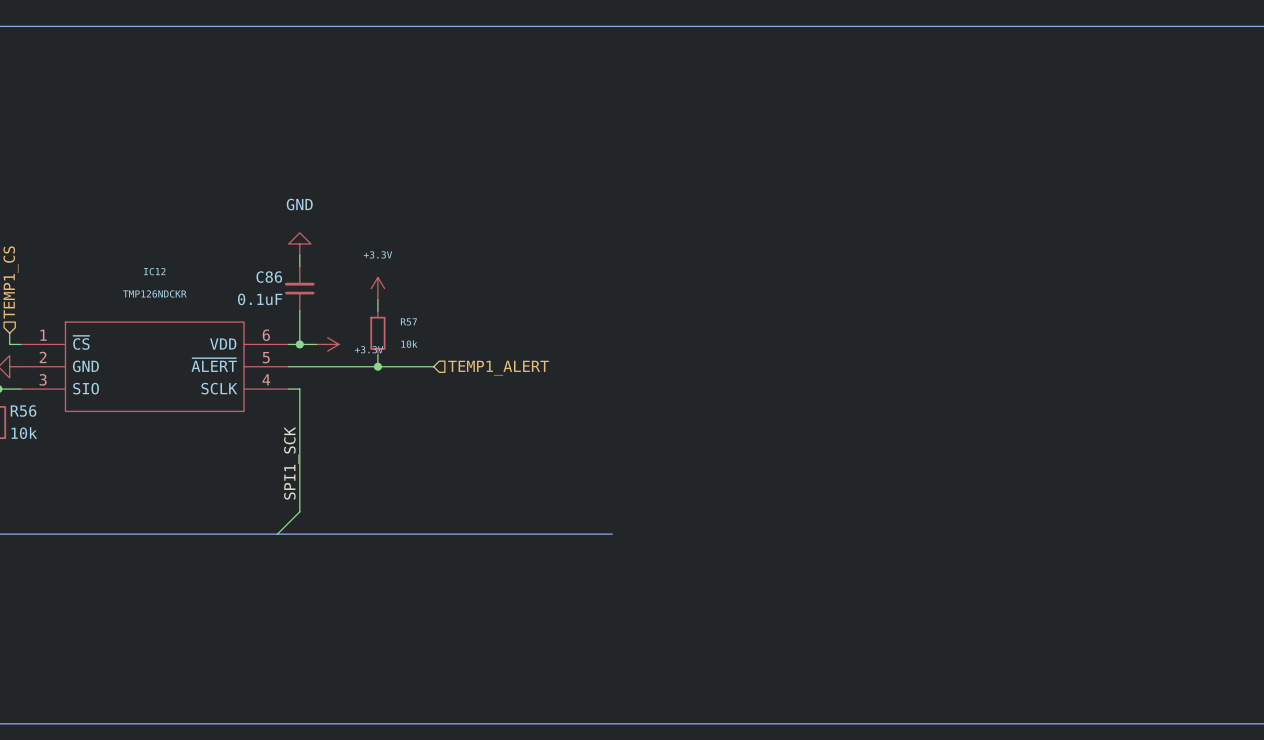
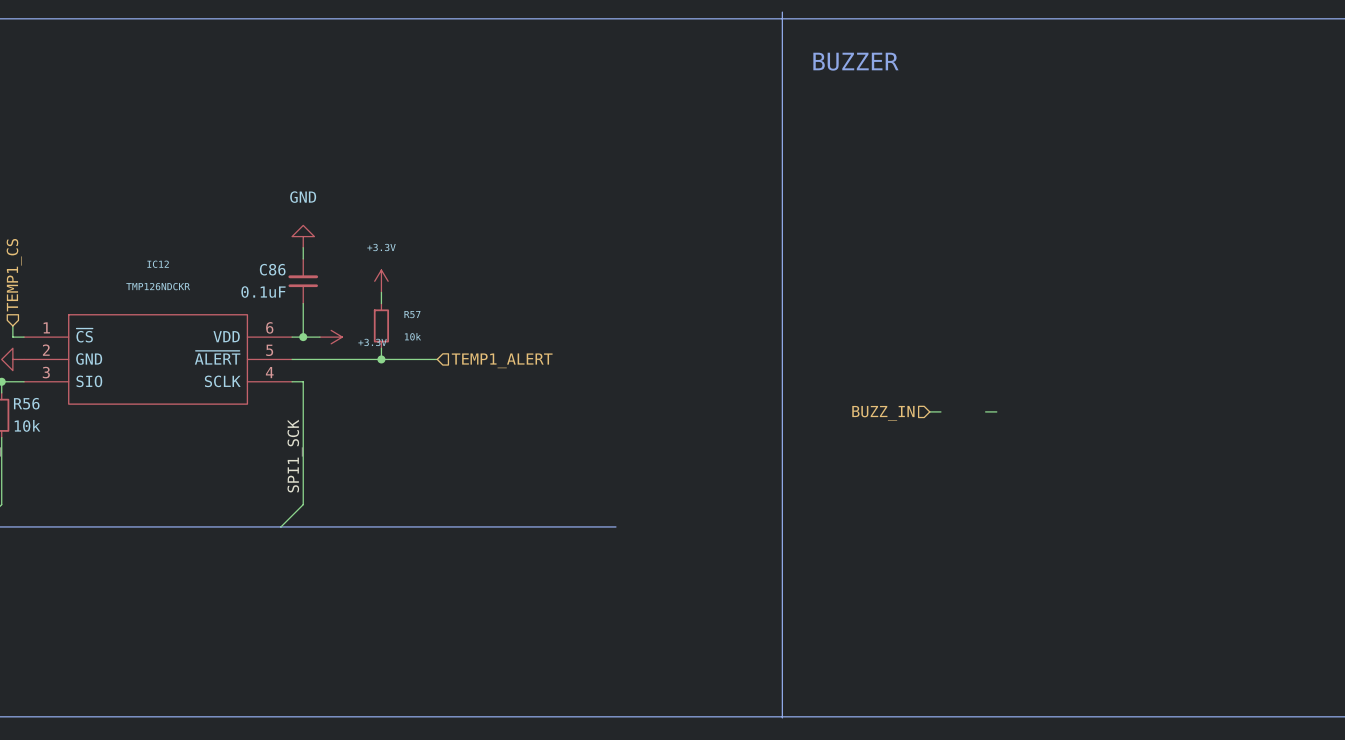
line: none -> (782, 12) (782, 717)
text: none -> BUZZER (855, 61)
wire: none -> (929, 411) (940, 411)
wire: none -> (985, 411) (996, 411)
hierarchical label: none -> BUZZ_IN (883, 413)

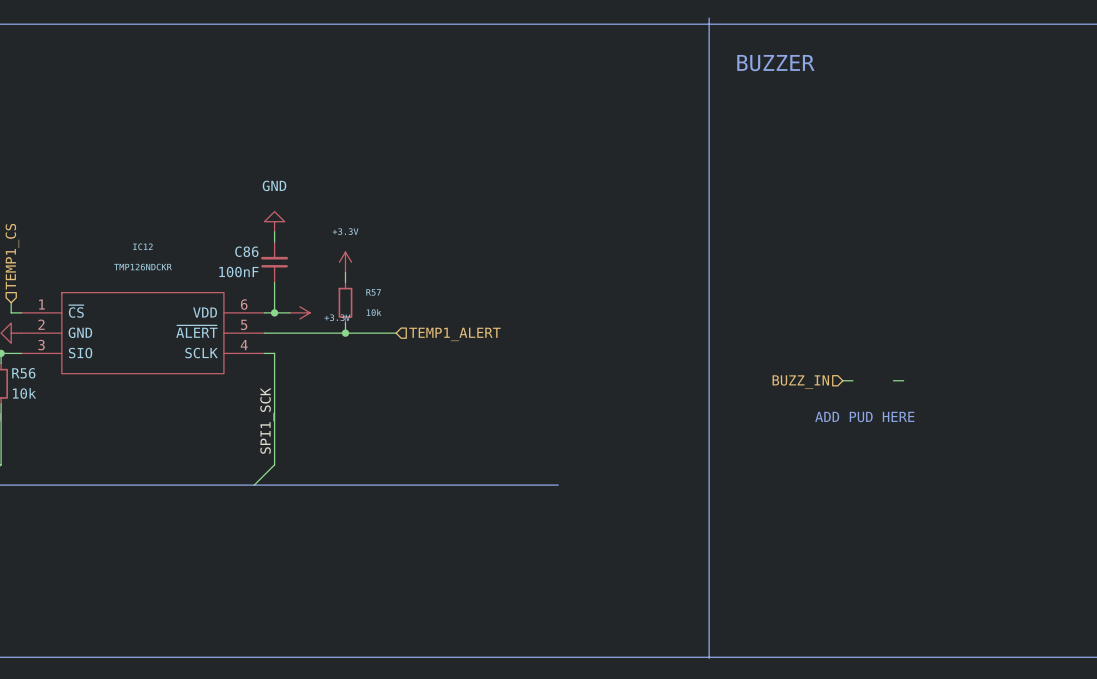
C86 value: 0.1uF (263, 292) -> 100nF (238, 272)
text: none -> ADD PUD HERE (864, 416)

